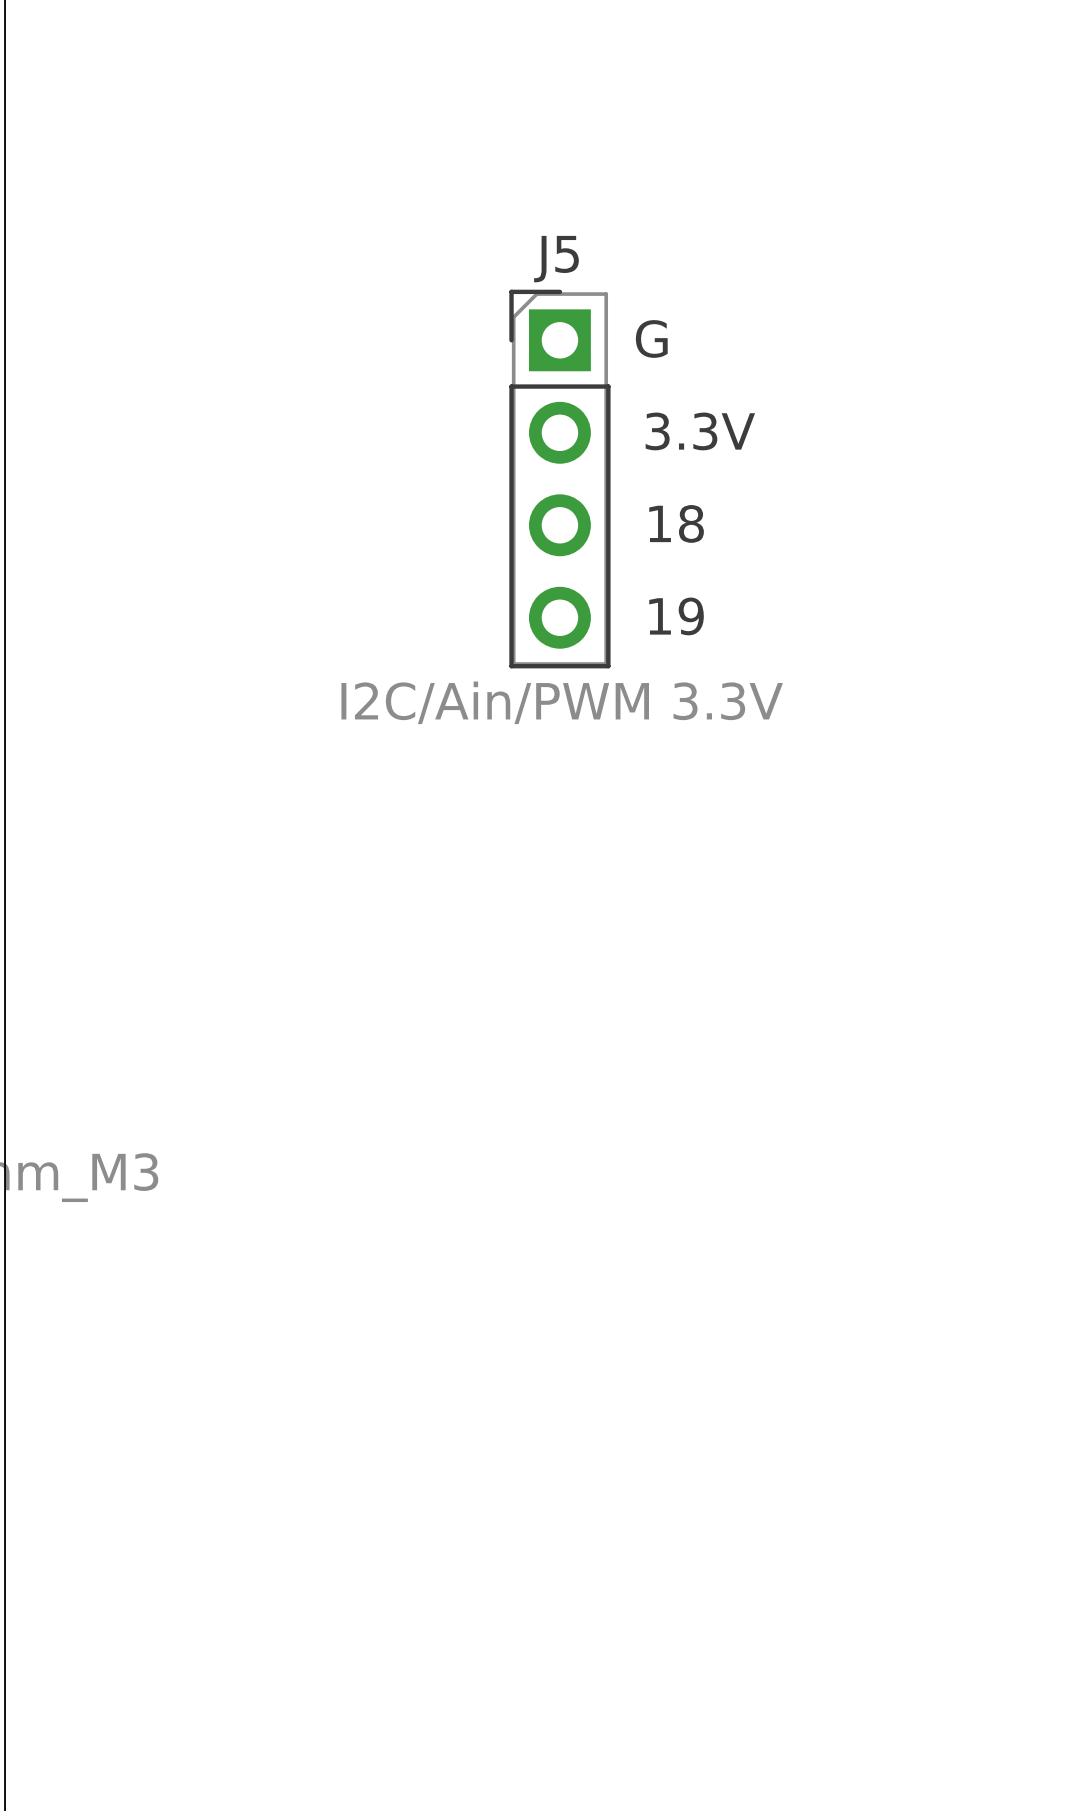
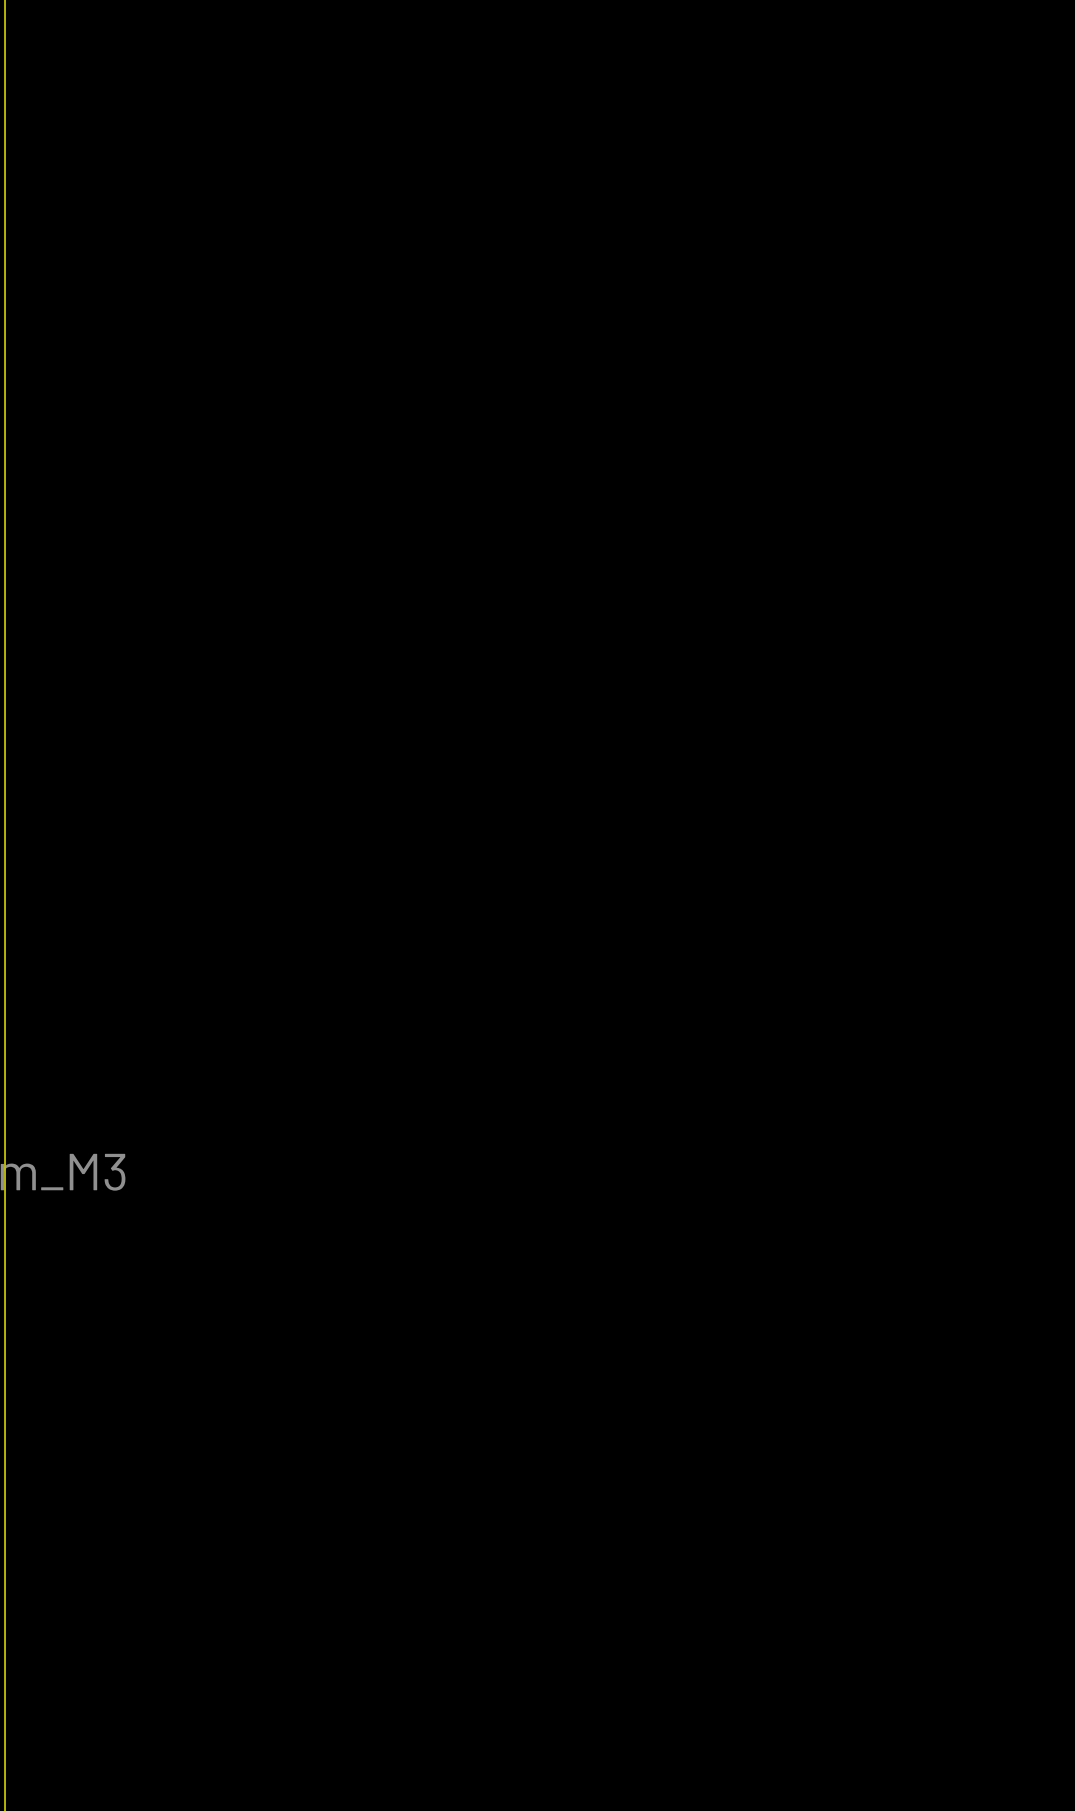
J5: I2C/Ain/PWM 3.3V (559, 479) -> none

